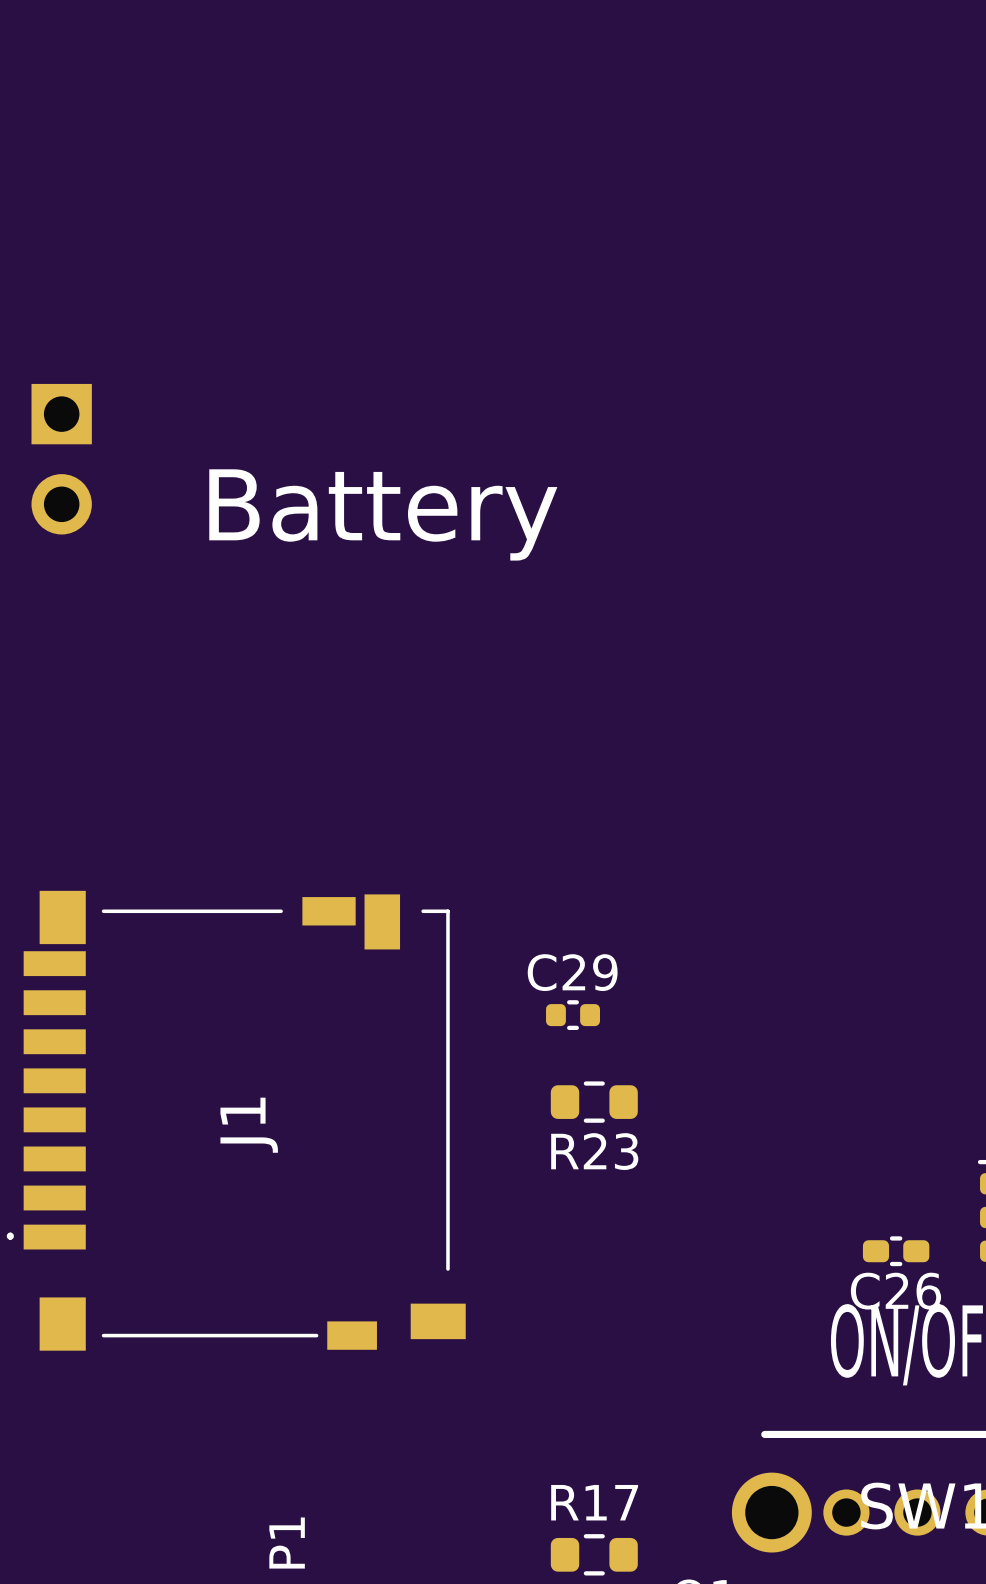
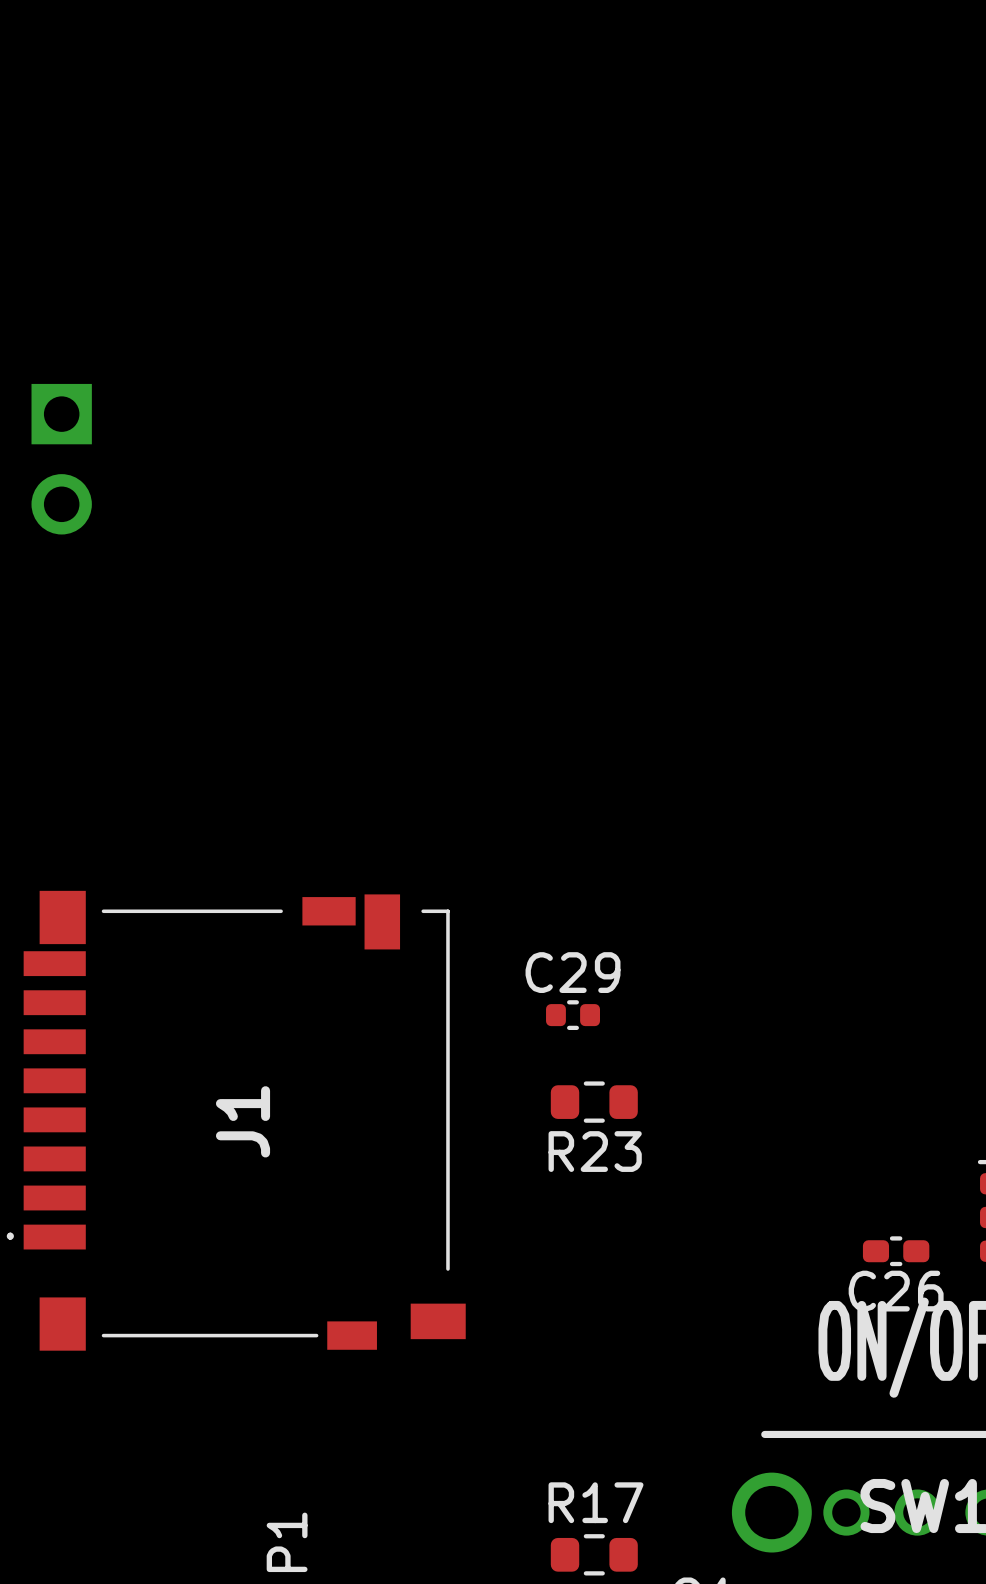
text: Battery (383, 514) -> none

